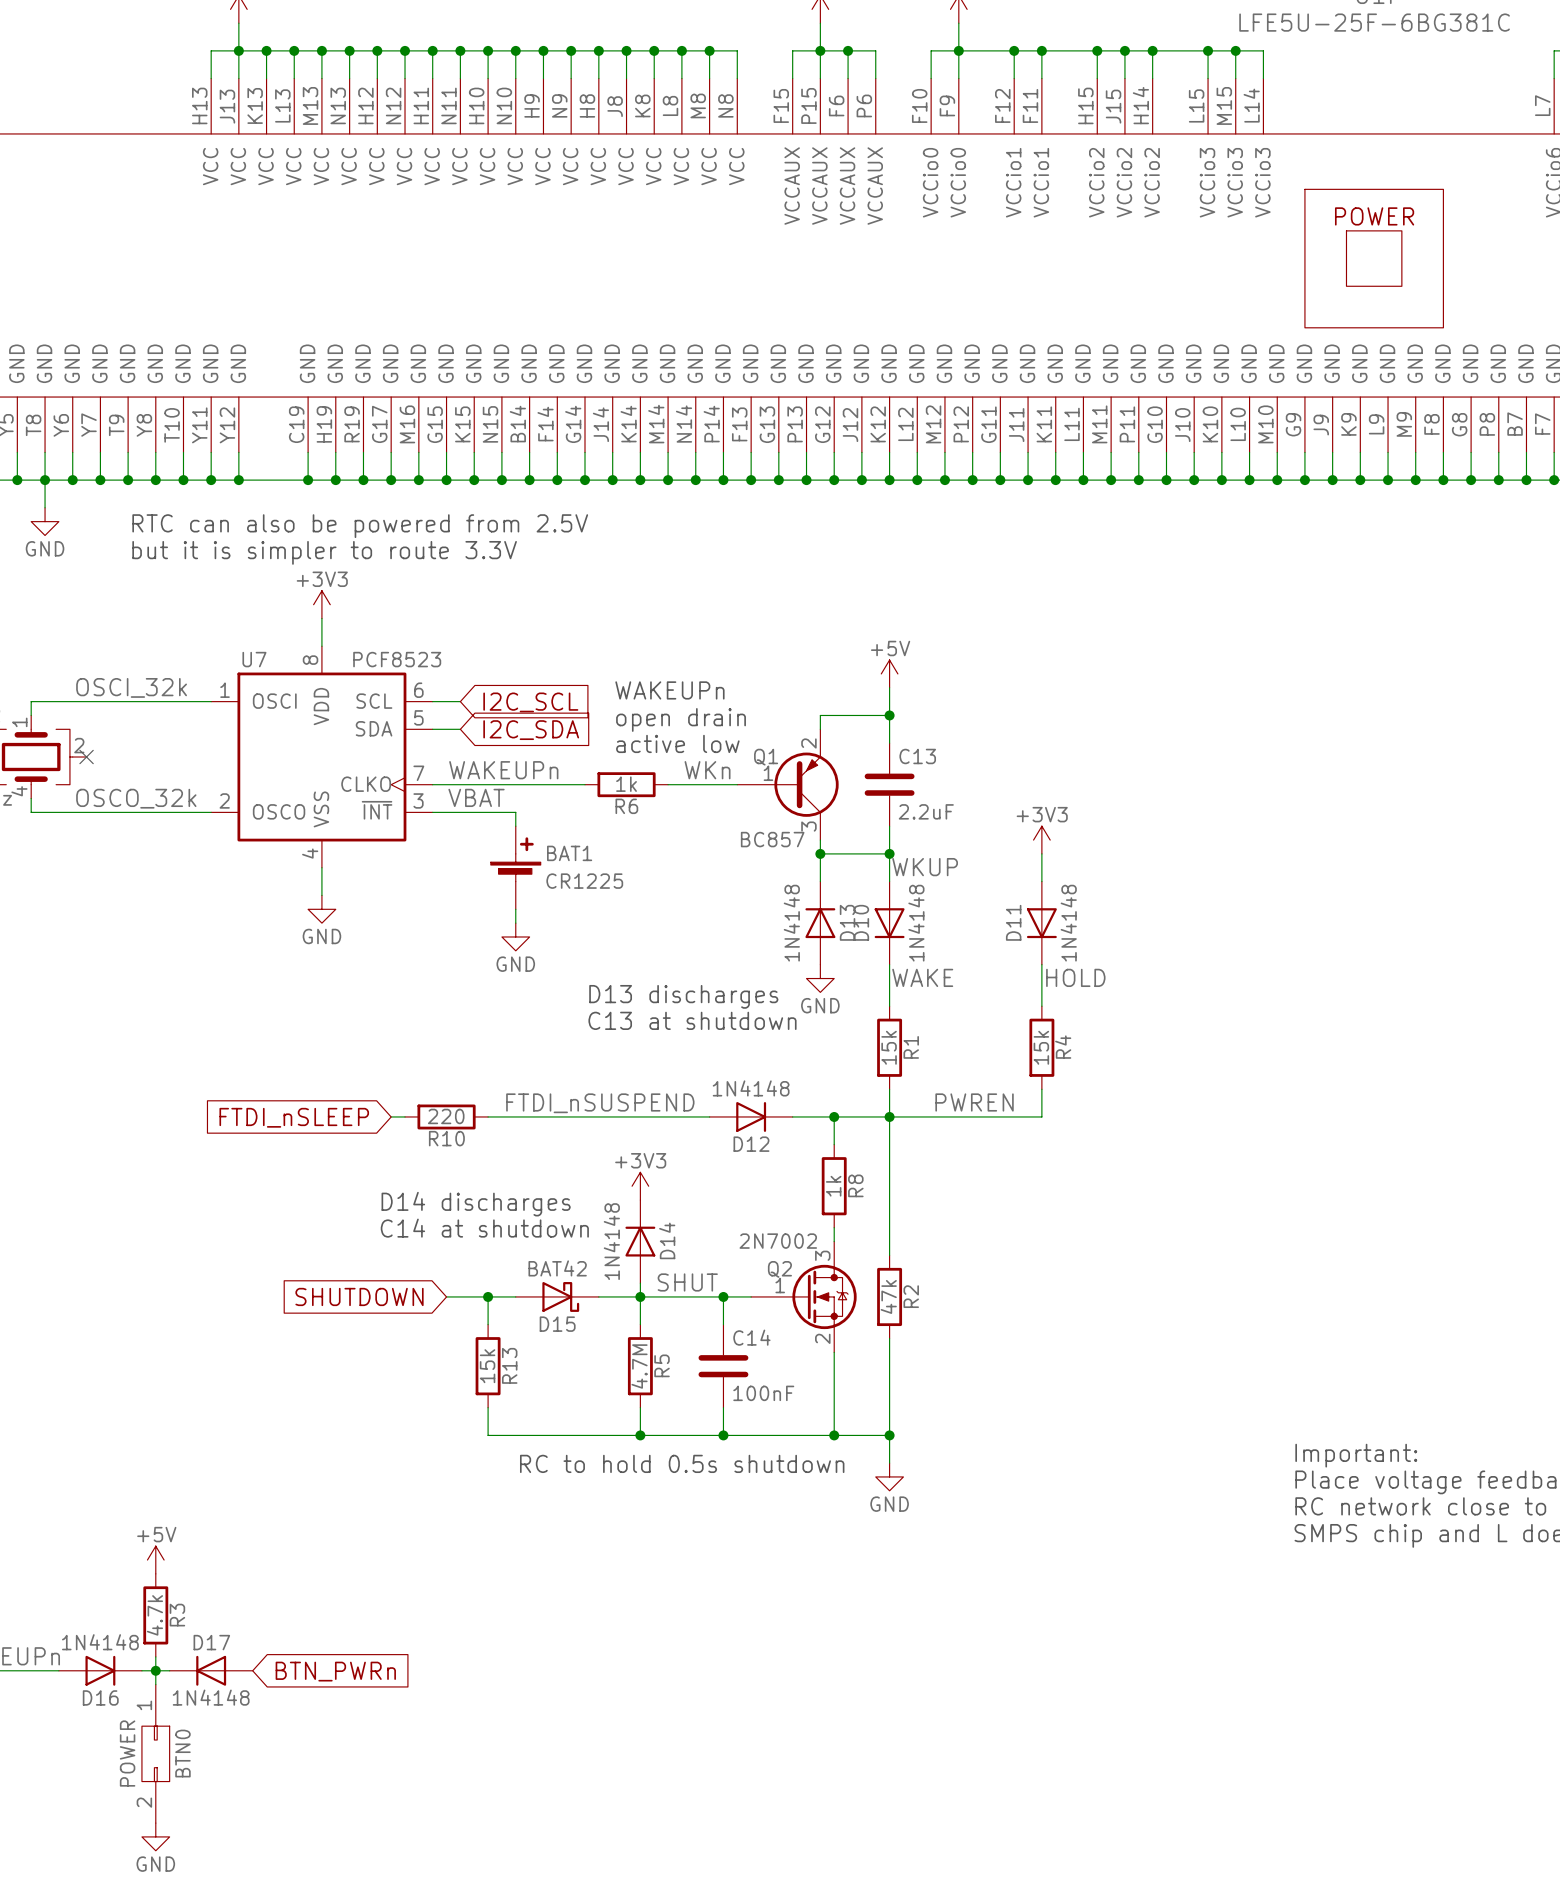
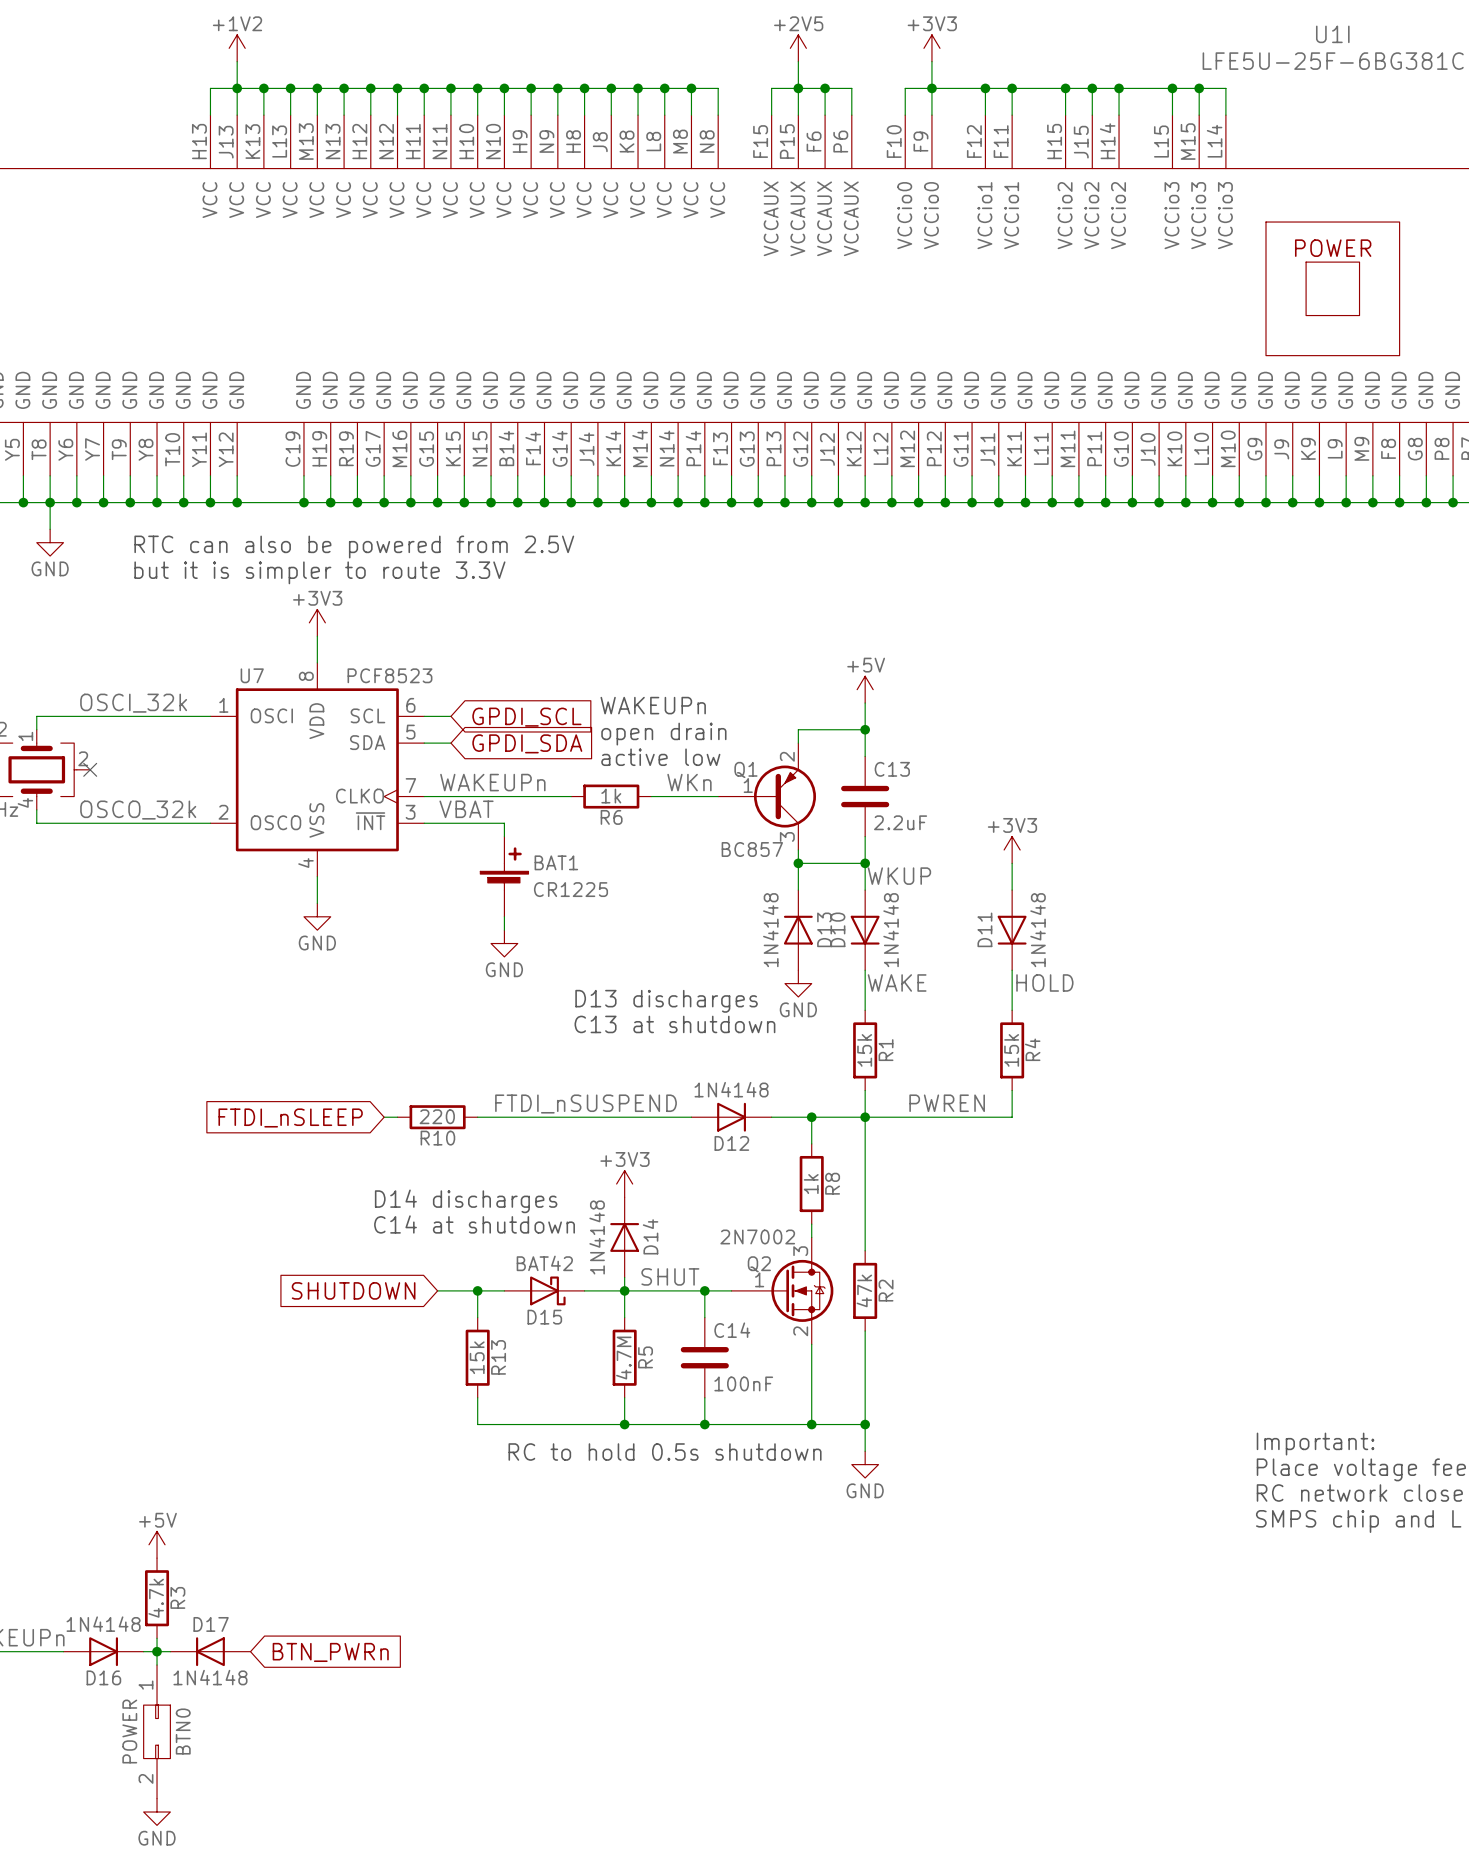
global label: I2C_SCL (530, 702) -> GPDI_SCL (526, 717)
global label: I2C_SDA (531, 730) -> GPDI_SDA (527, 743)

